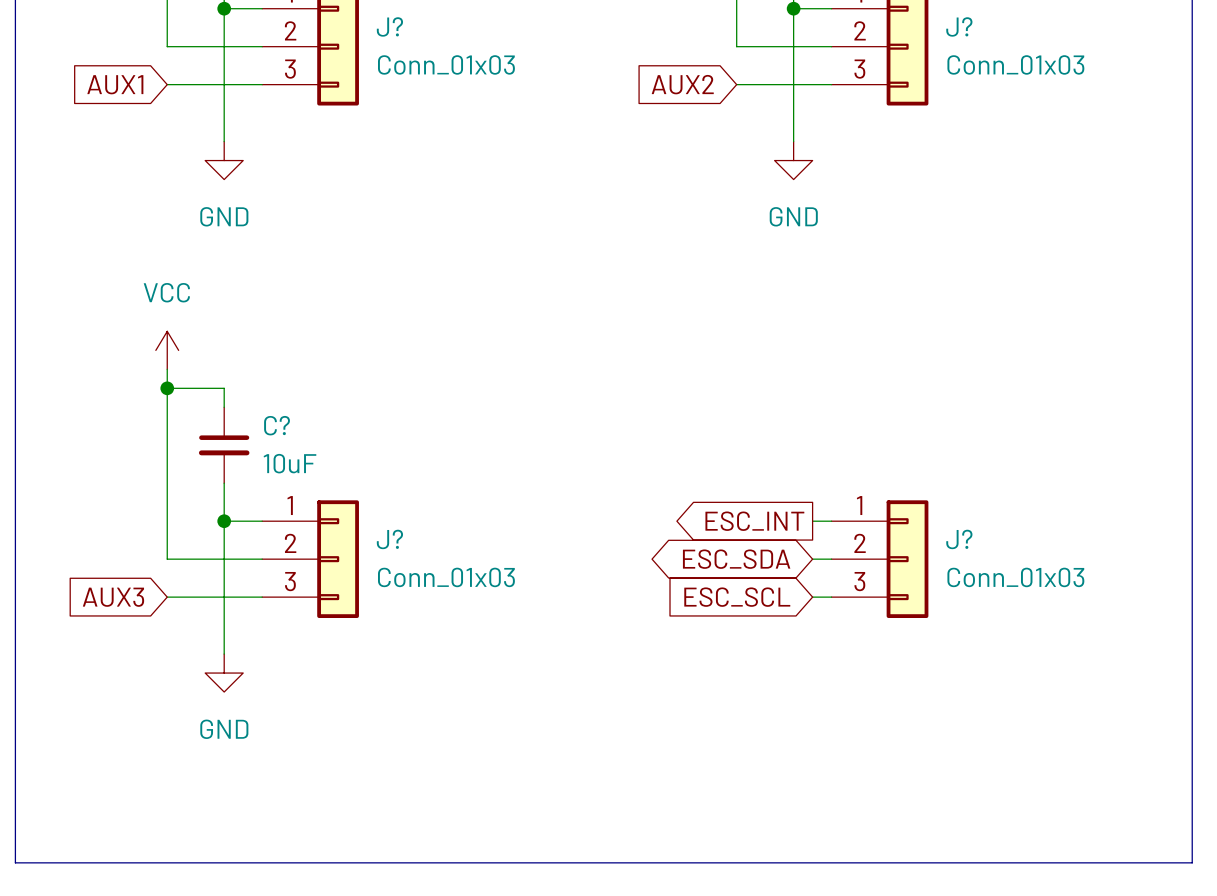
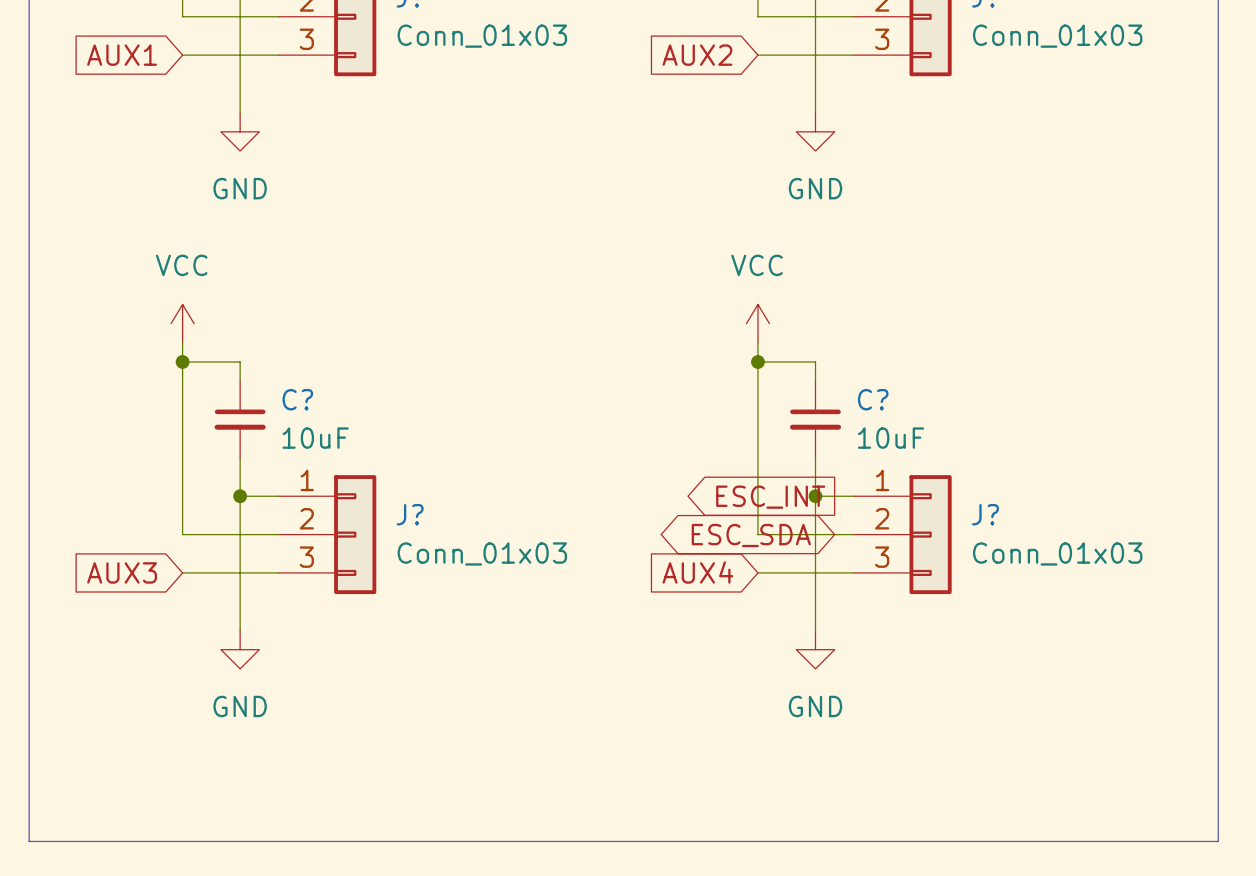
power symbol: none -> VCC (757, 323)
wire: none -> (757, 342) (757, 534) (834, 534)
wire: none -> (757, 361) (815, 361) (815, 381)
junction: none -> (757, 361)
C?: none -> 10uF (815, 419)
wire: none -> (815, 457) (815, 630)
wire: none -> (815, 496) (834, 496)
junction: none -> (815, 496)
global label: none -> AUX4 (697, 572)
wire: none -> (757, 572) (834, 572)
global label: ESC_SCL (737, 597) -> none
power symbol: none -> GND (815, 649)

